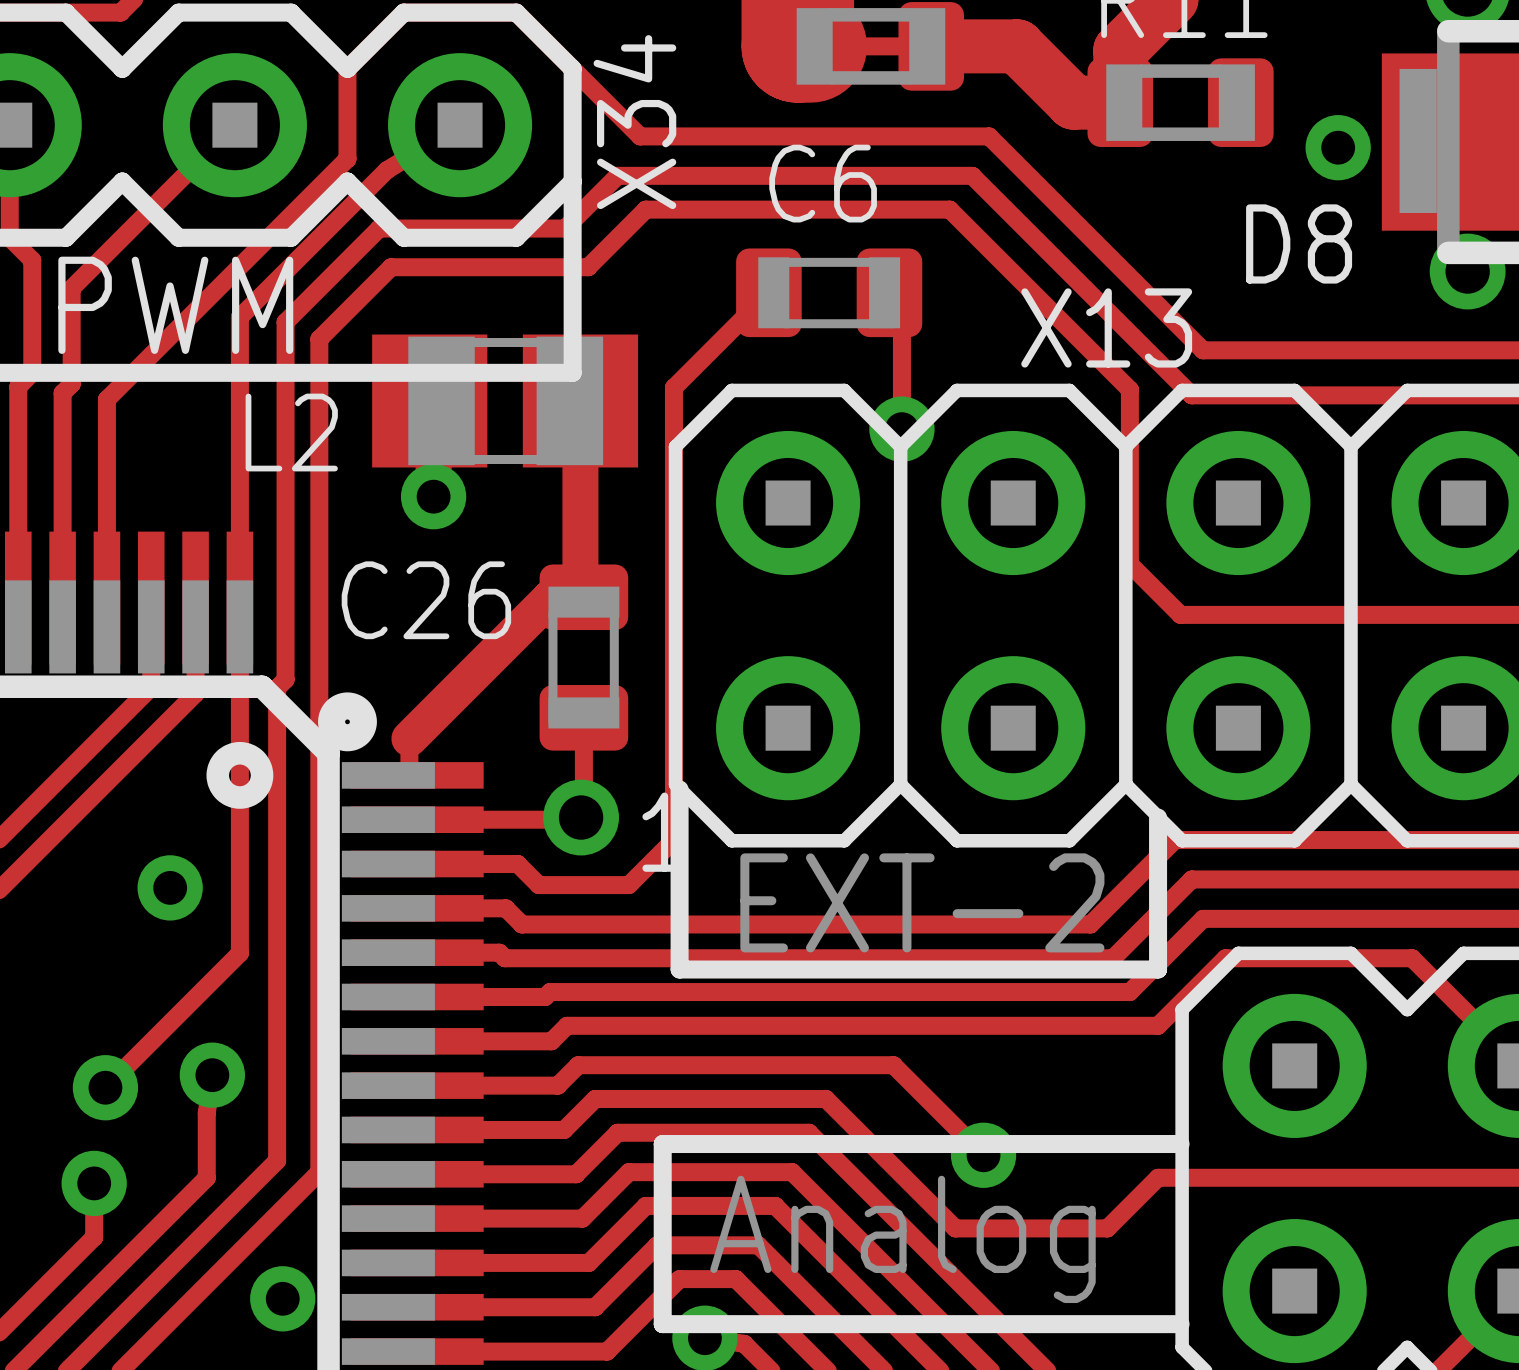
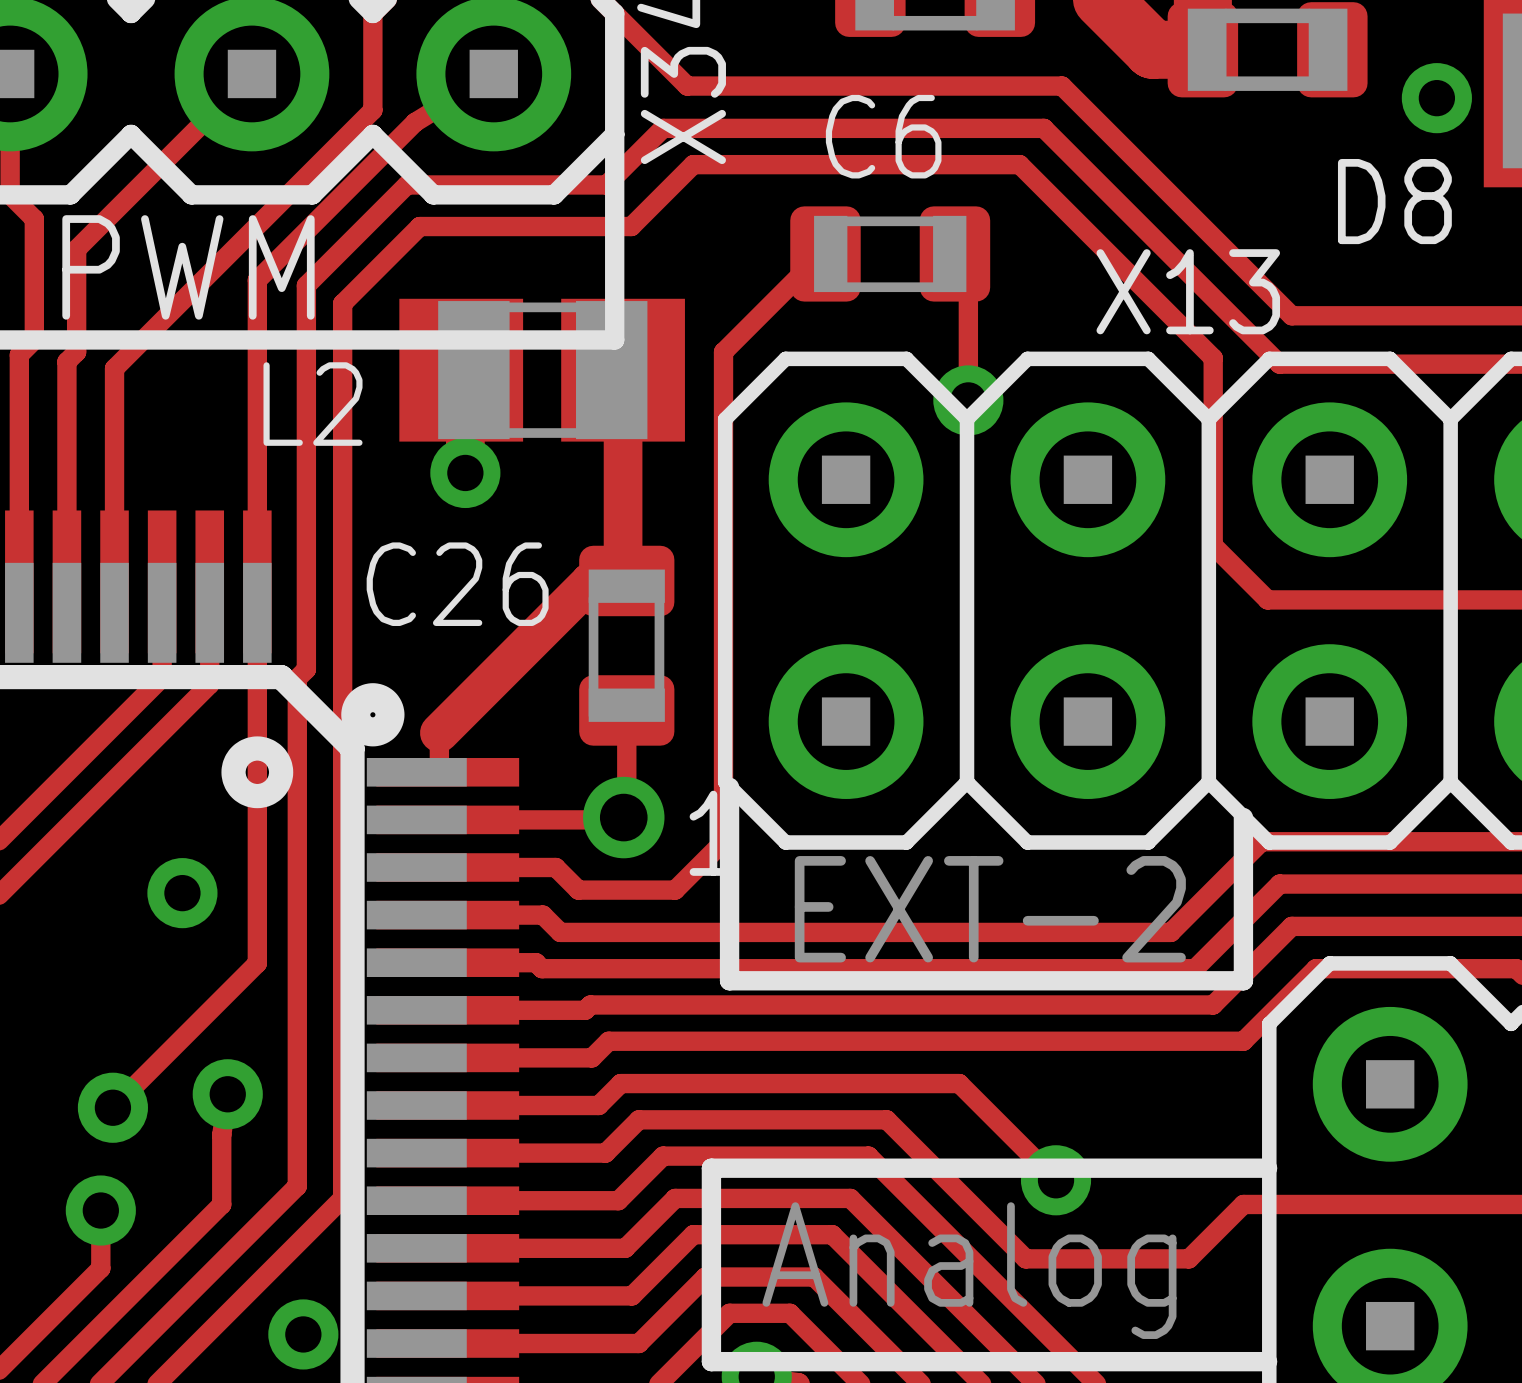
track: (768, 292) (673, 387) -> (825, 253) (844, 223) (844, 231) (723, 352) (723, 355)

